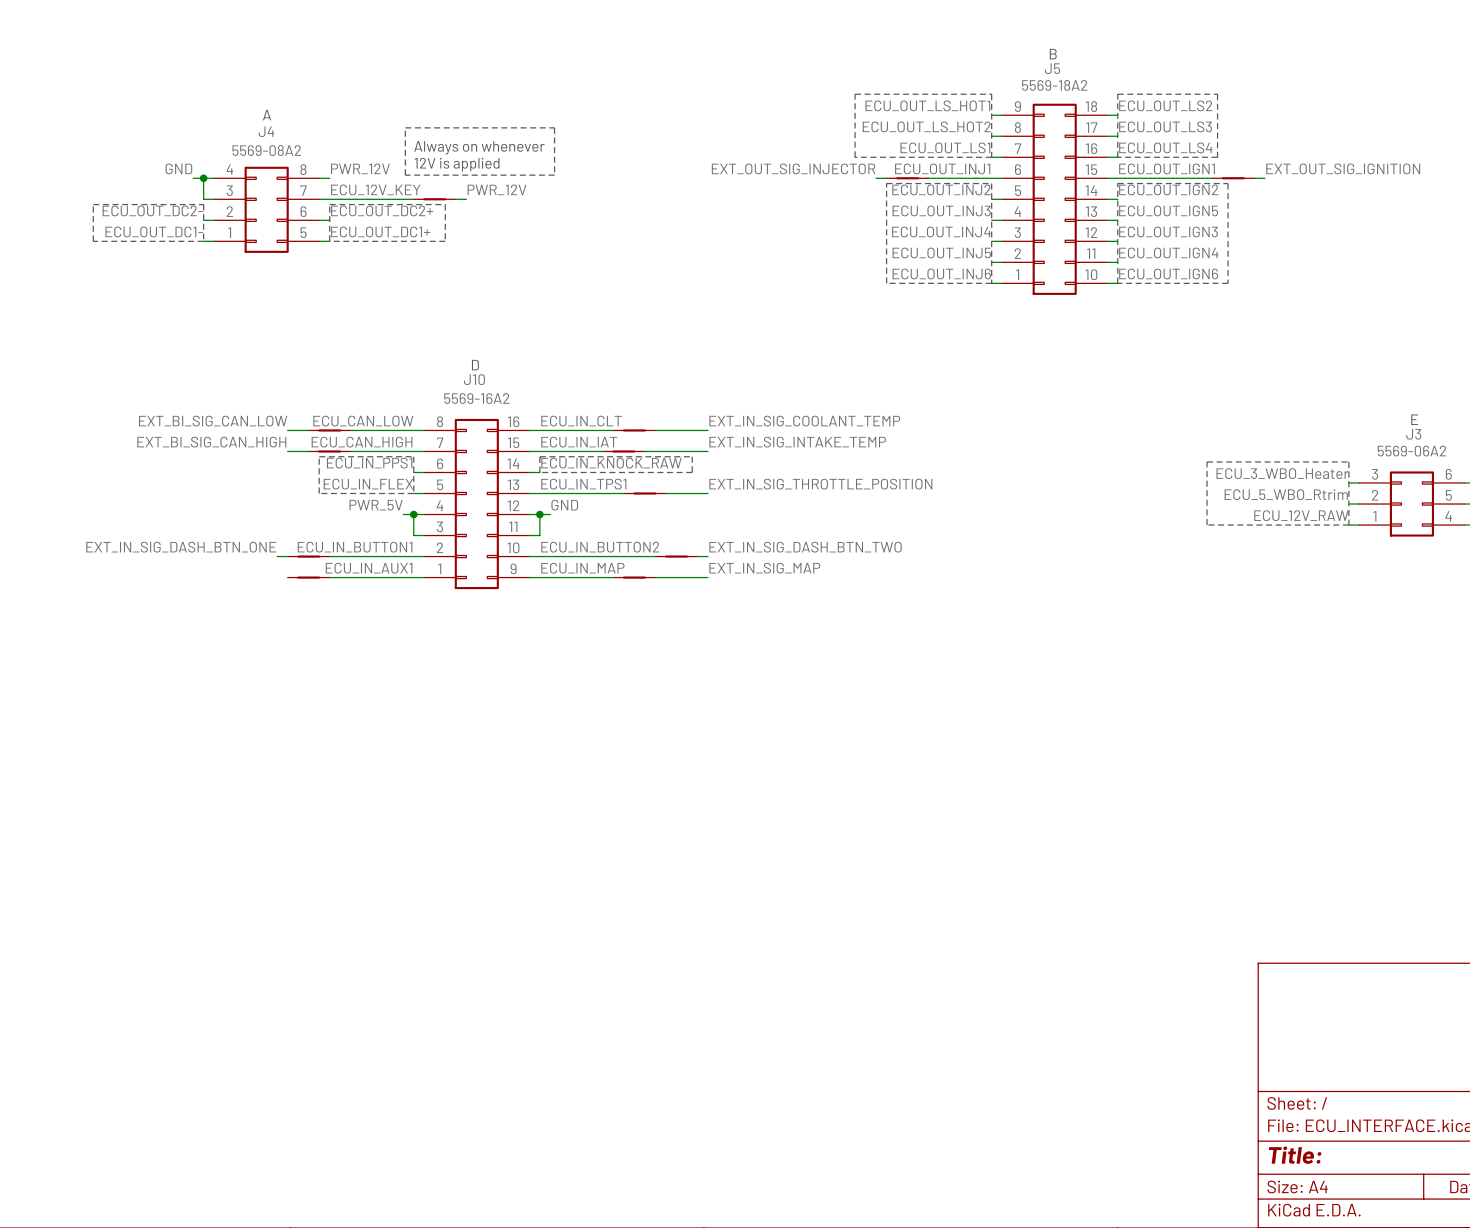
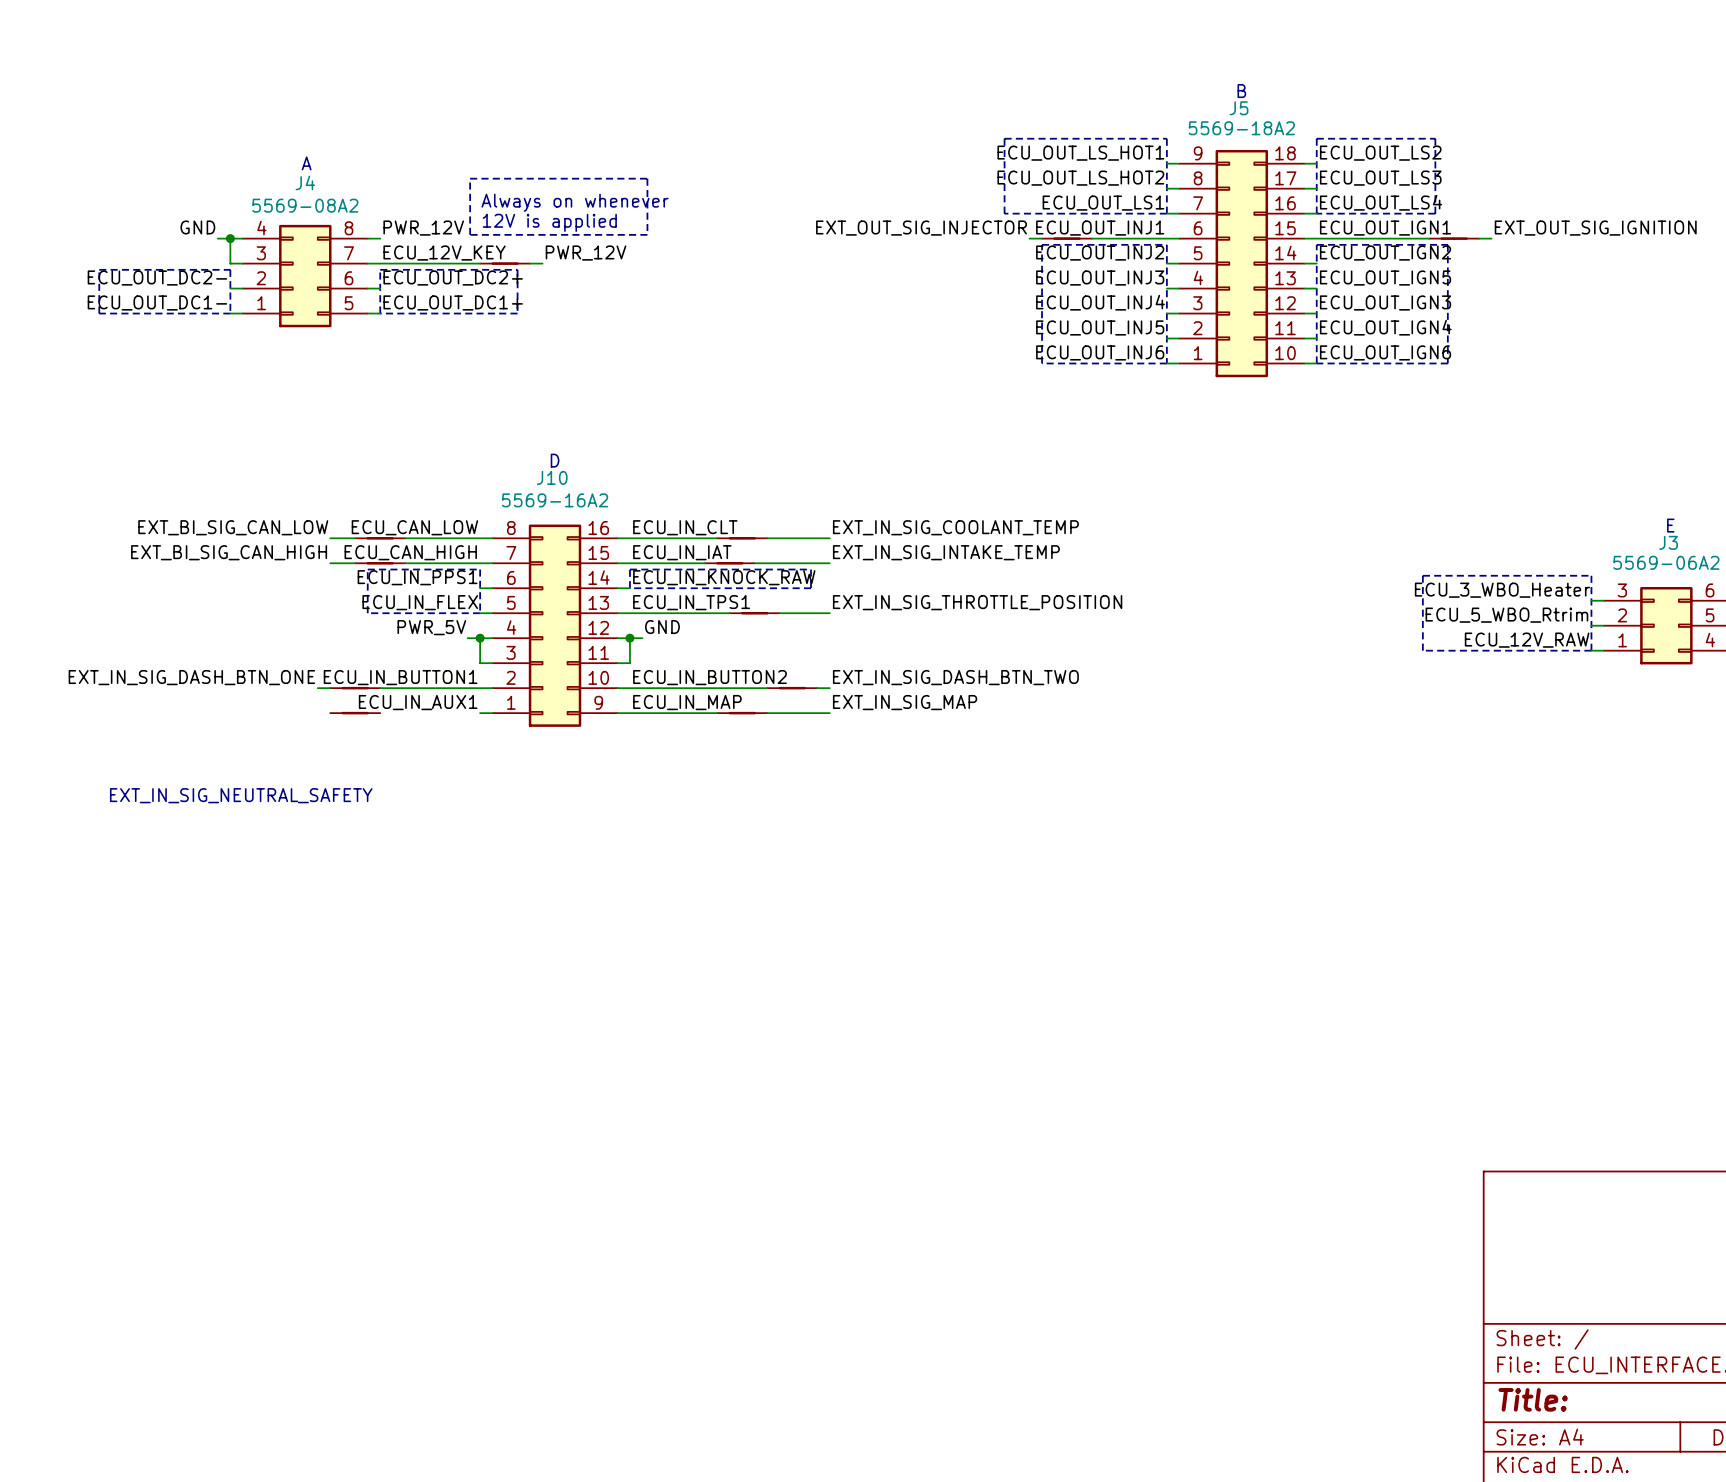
wire: (329, 577) (413, 577) -> none
text: none -> EXT_IN_SIG_NEUTRAL_SAFETY (241, 795)

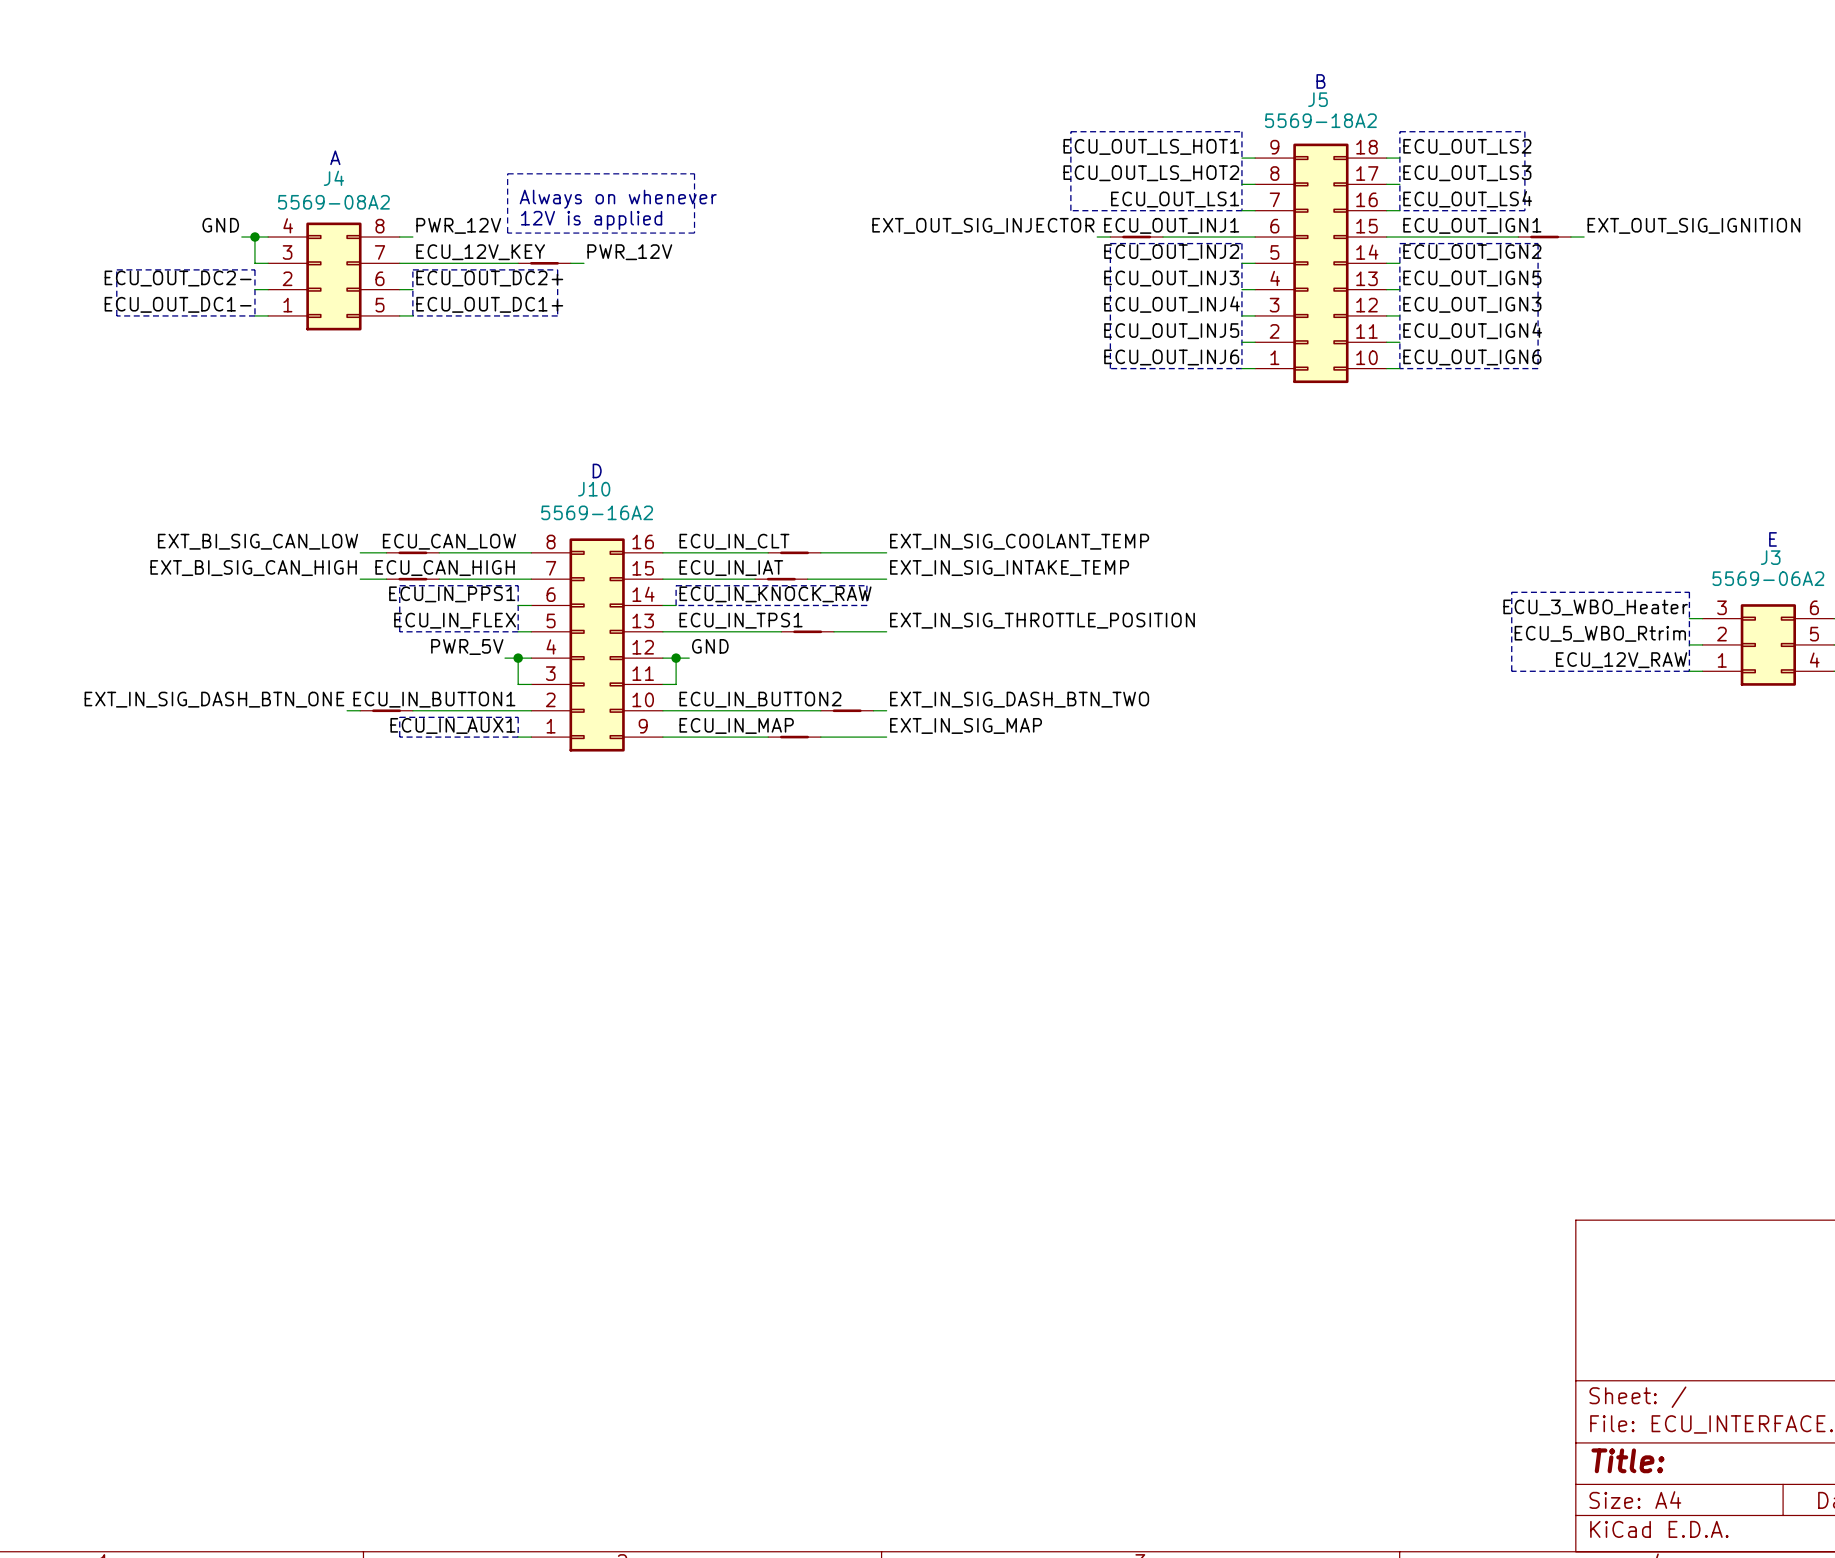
line: none -> (399, 717) (518, 717) (518, 737) (399, 737) (399, 717)
part: (355, 713) -> none
text: EXT_IN_SIG_NEUTRAL_SAFETY (241, 795) -> none

